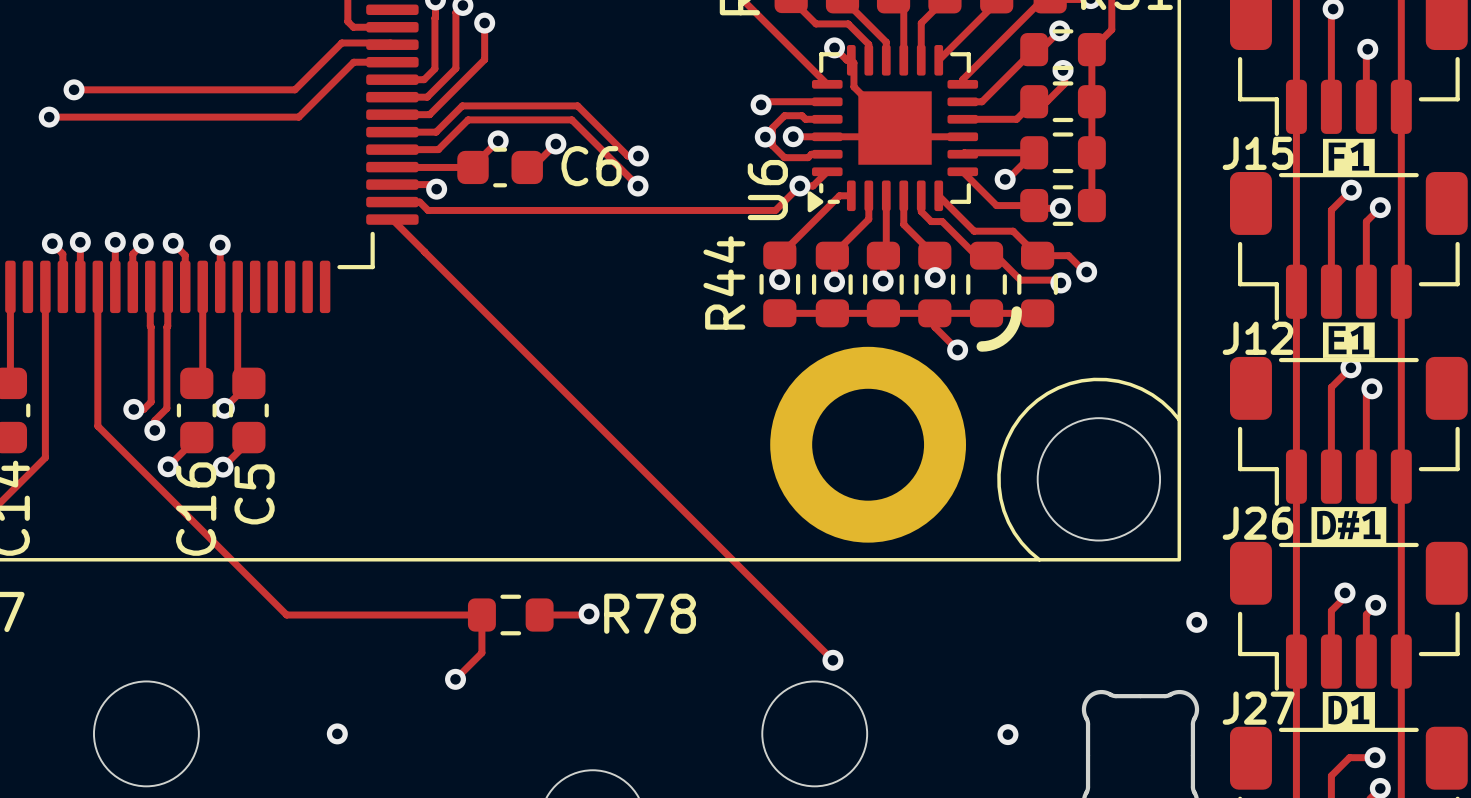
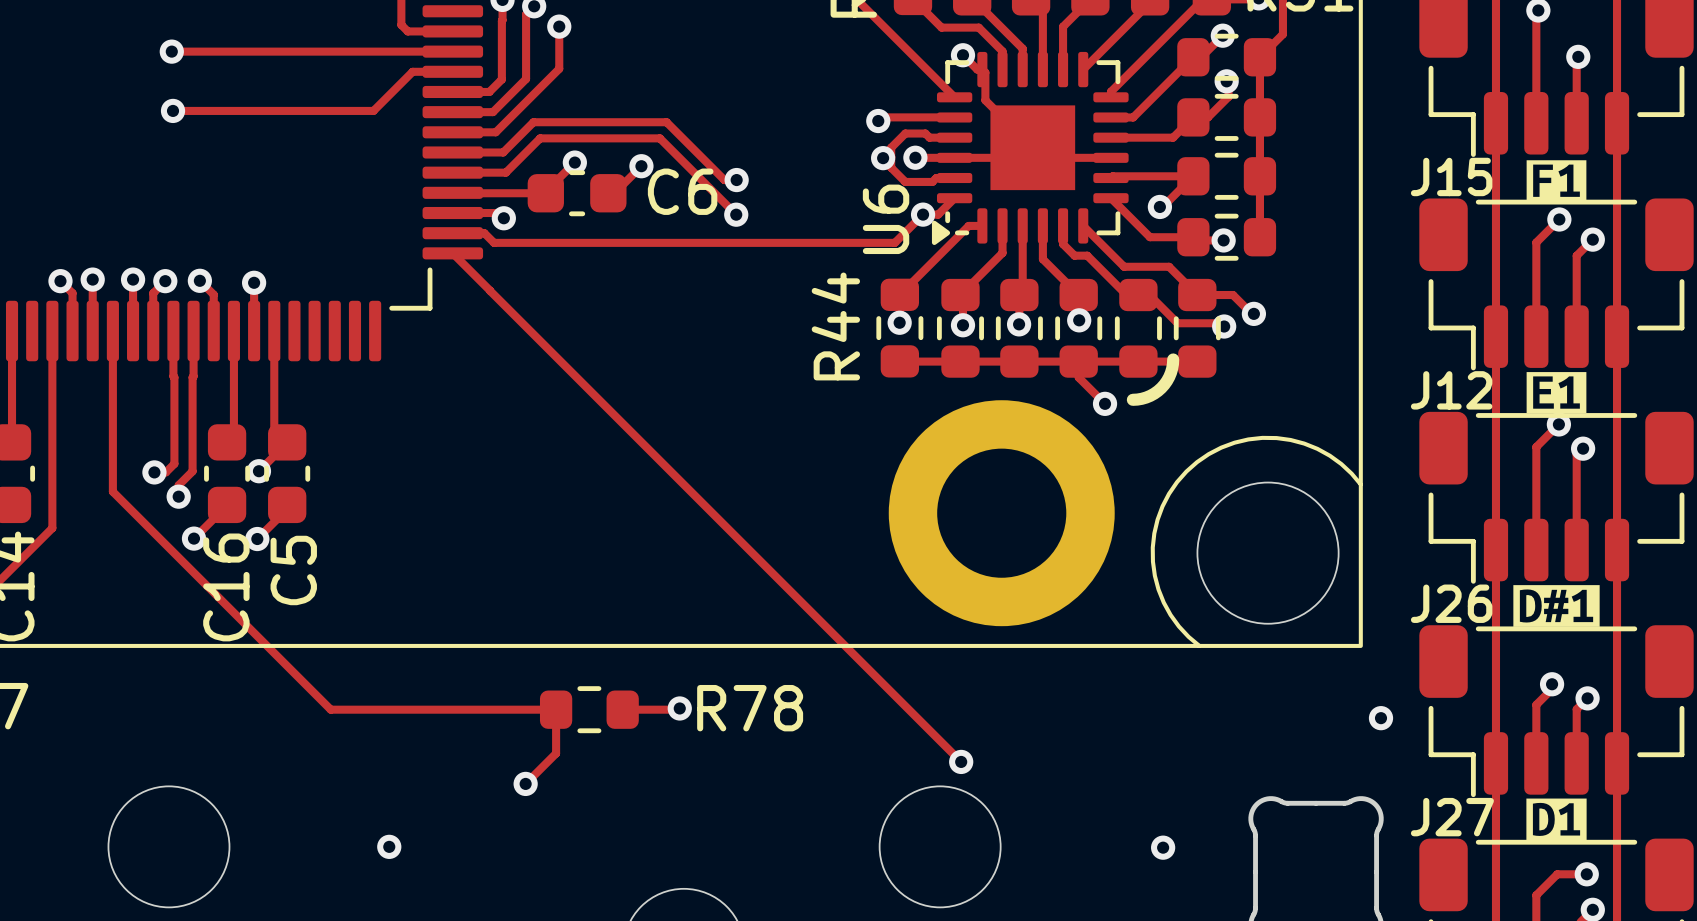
via: none -> (171, 51)
track: (392, 44) (390, 42) (341, 42) (294, 89) (74, 89) -> (452, 51) (171, 51)
track: (357, 62) (353, 62) (298, 117) (49, 117) -> (412, 71) (373, 110) (173, 110)
via: (74, 89) -> none
via: none -> (173, 110)
via: (49, 117) -> none

